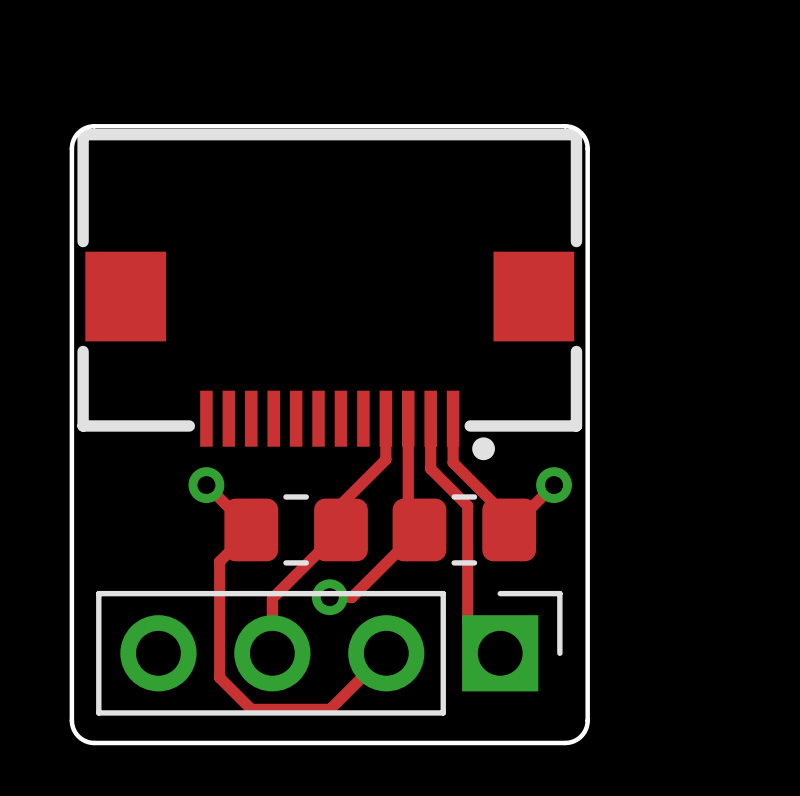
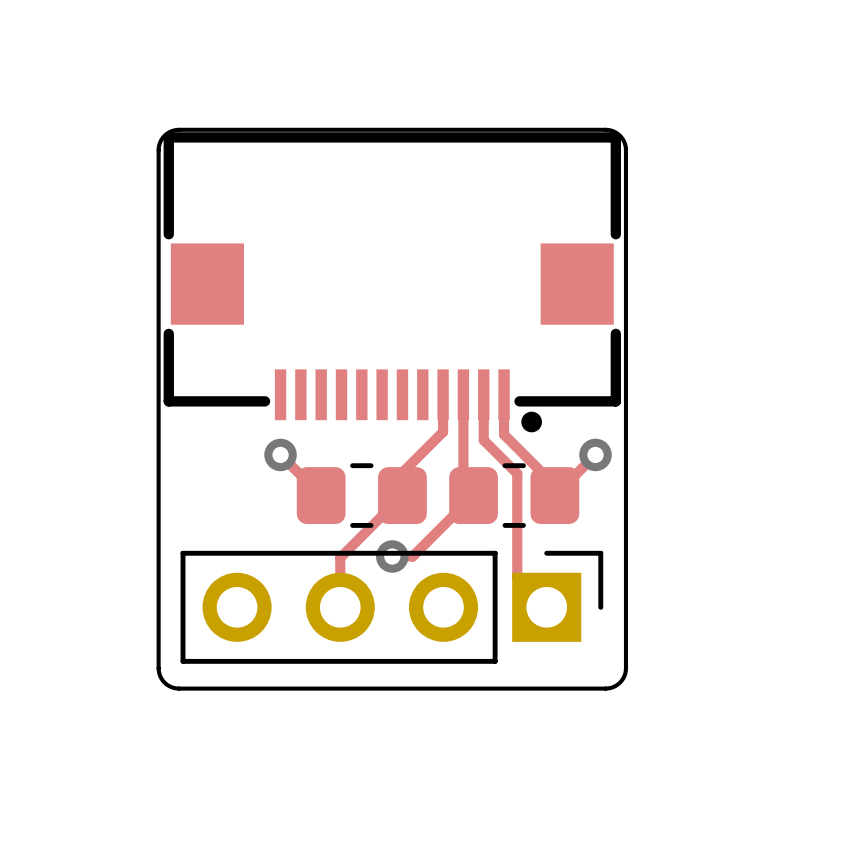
track: (251, 529) (219, 561) (219, 677) (251, 709) (330, 709) (386, 653) -> none

